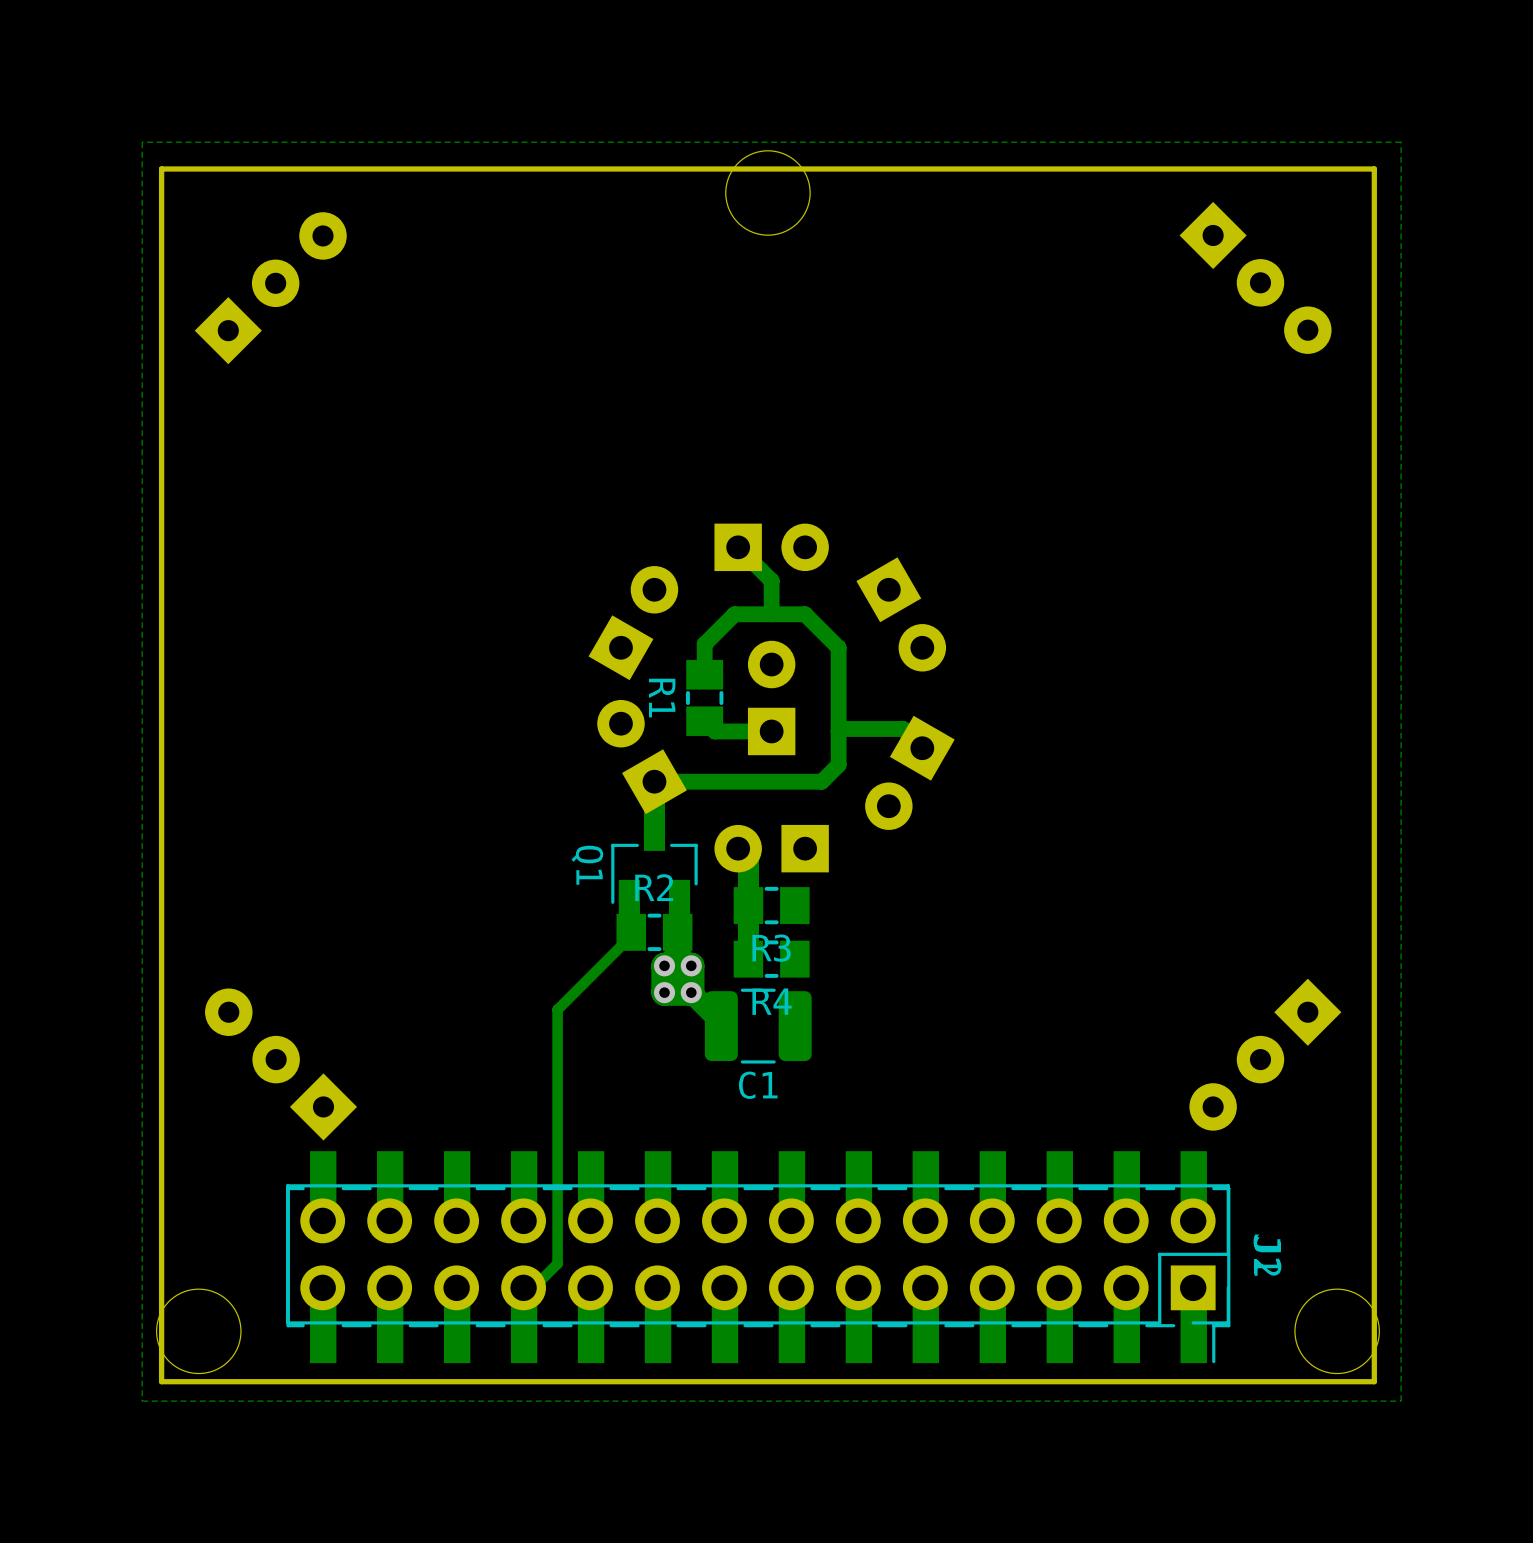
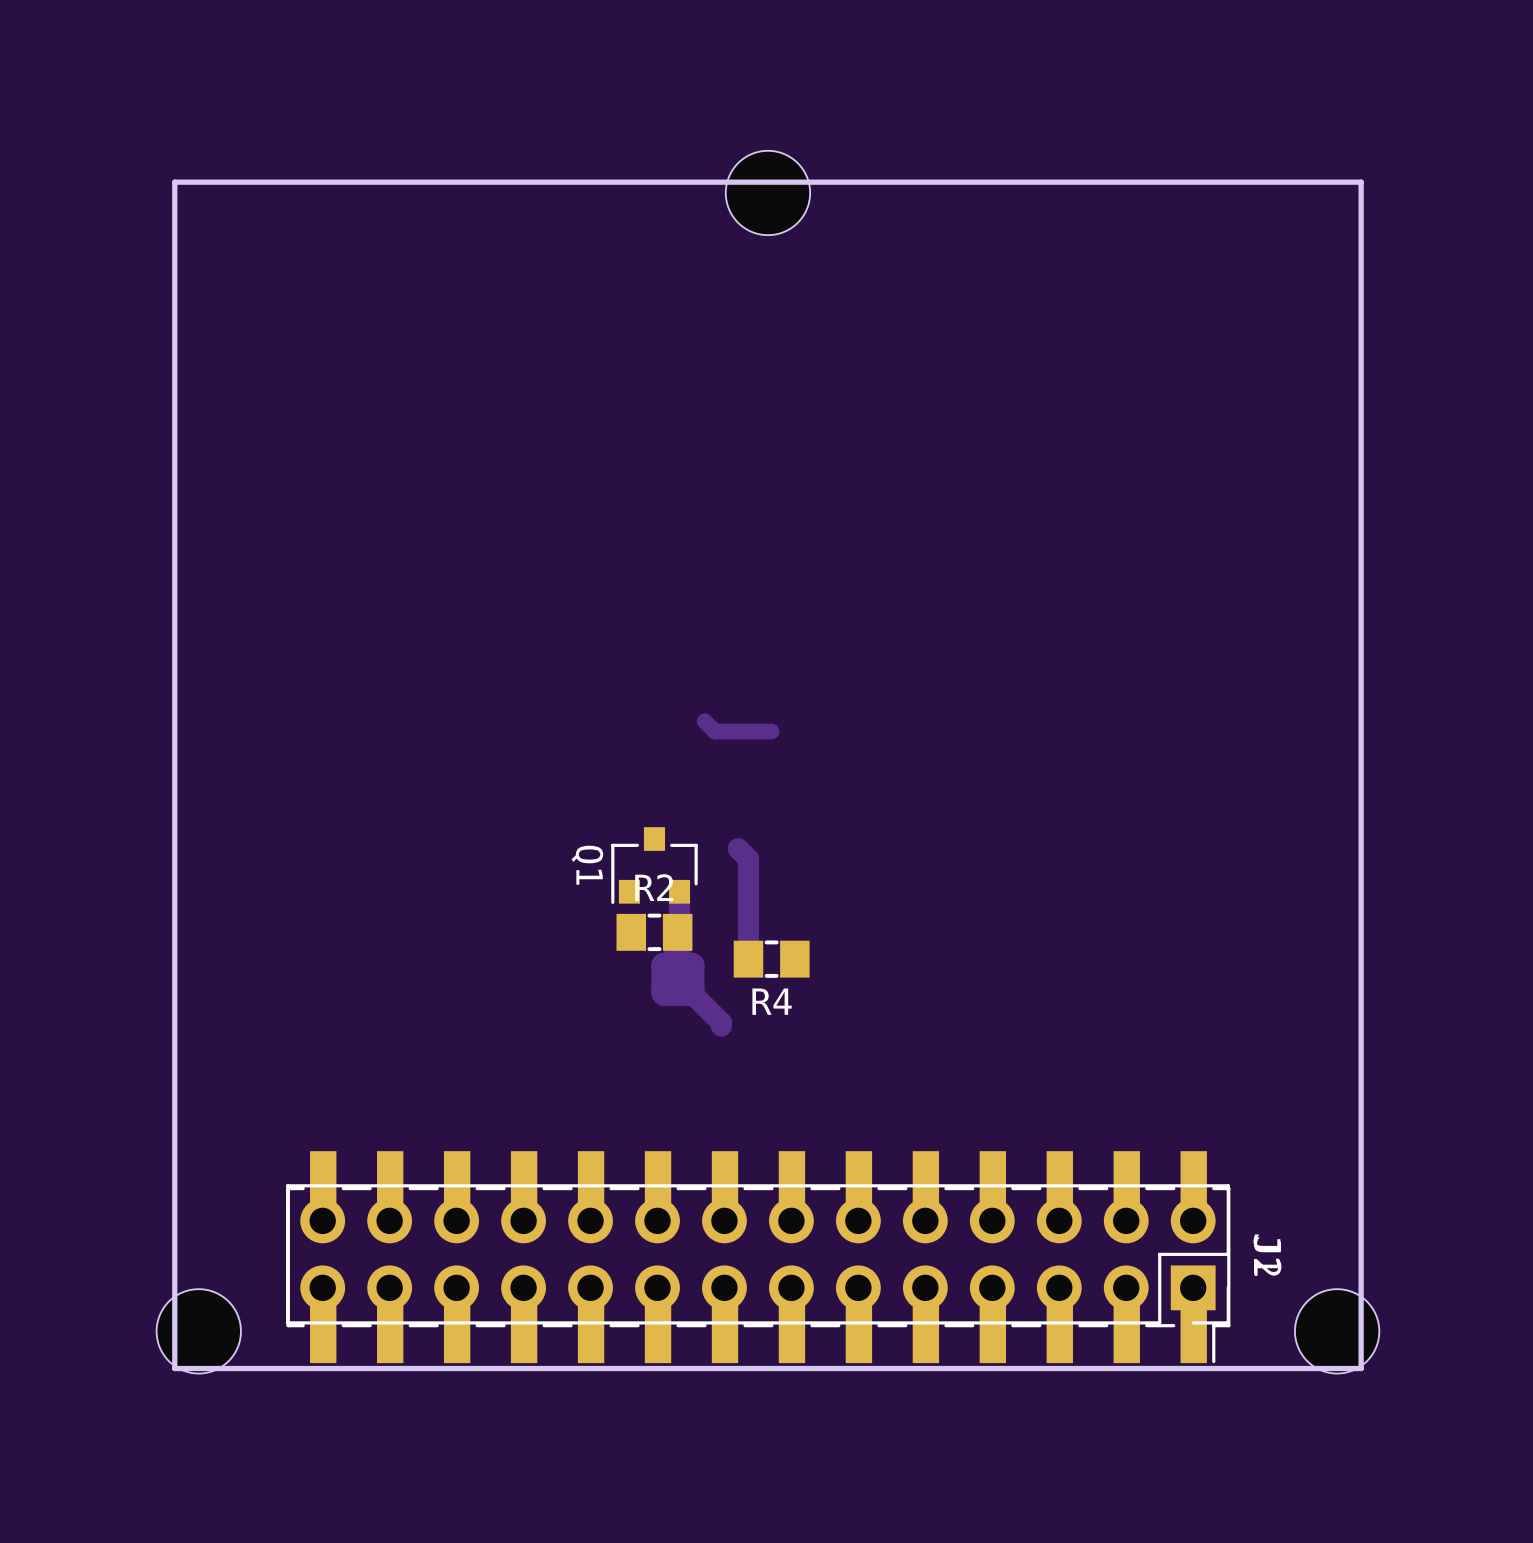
zone outline: (1401, 142) (142, 142) (142, 1401) (1401, 1401) (1401, 142) -> none
board edge: (1374, 168) (1374, 1381) (161, 1381) (161, 168) (1374, 168) -> (1361, 182) (1361, 1368) (174, 1368) (174, 182) (1361, 182)
part: (1255, 277) -> none
part: (270, 288) -> none
track: (738, 547) (771, 580) (771, 614) -> none
part: (771, 547) -> none
part: (901, 614) -> none
part: (633, 623) -> none
track: (704, 674) (704, 644) (734, 614) (805, 614) (838, 647) (838, 764) (821, 781) (654, 781) (654, 839) -> none
R1: (704, 697) -> none
part: (771, 697) -> none
track: (838, 731) (841, 728) (903, 728) (922, 748) -> none
part: (642, 757) -> none
part: (909, 772) -> none
part: (771, 848) -> none
track: (629, 891) (629, 930) (631, 936) (557, 1009) (557, 1263) (524, 1297) (524, 1323) -> none
R3: (771, 905) -> none
via: (664, 965) -> none
via: (691, 965) -> none
via: (664, 992) -> none
via: (691, 992) -> none
C1: (758, 1026) -> none
part: (1265, 1054) -> none
part: (281, 1064) -> none

